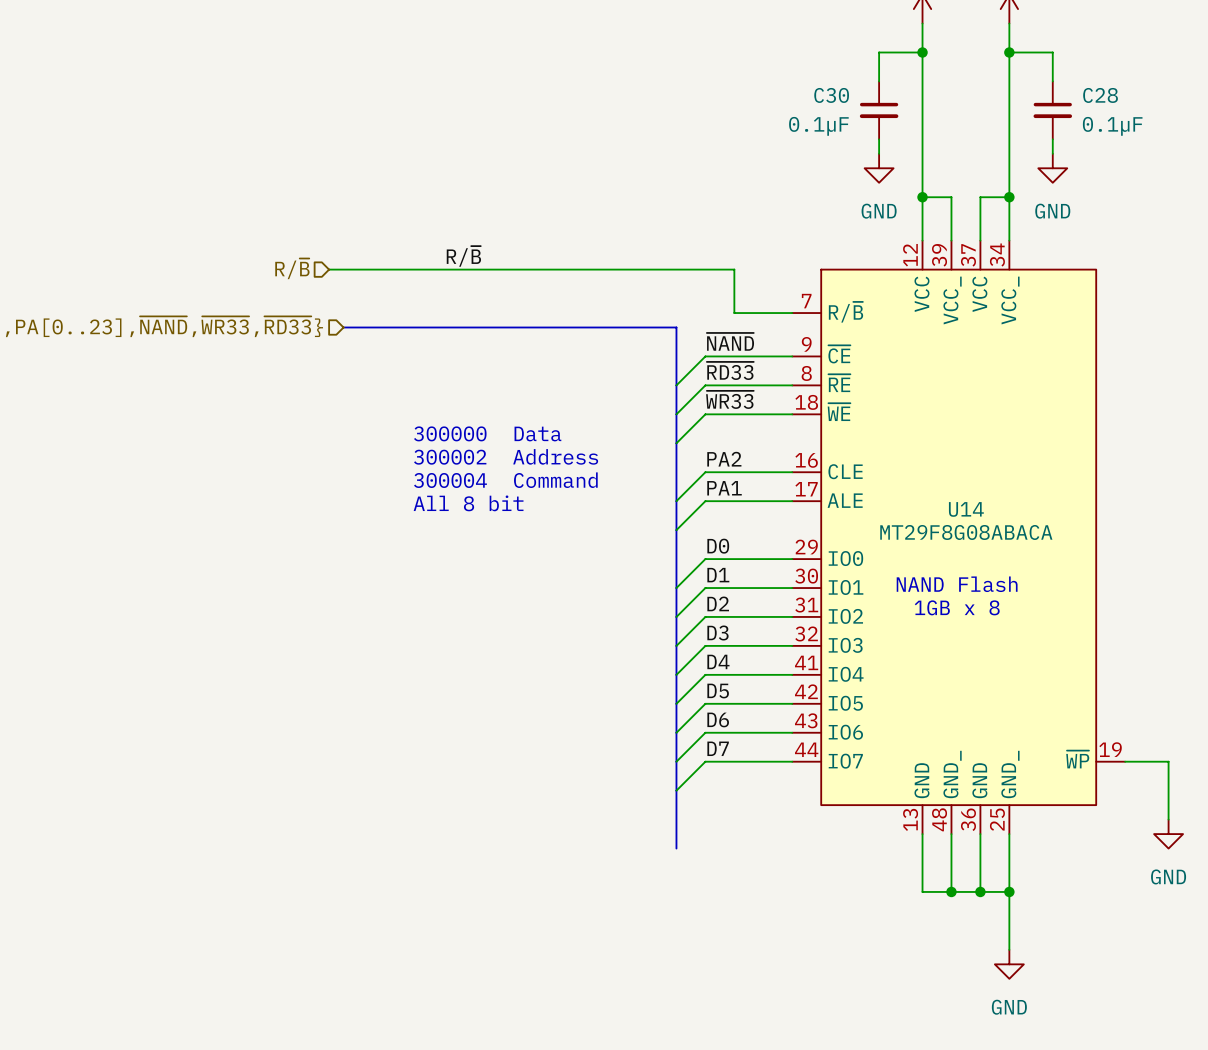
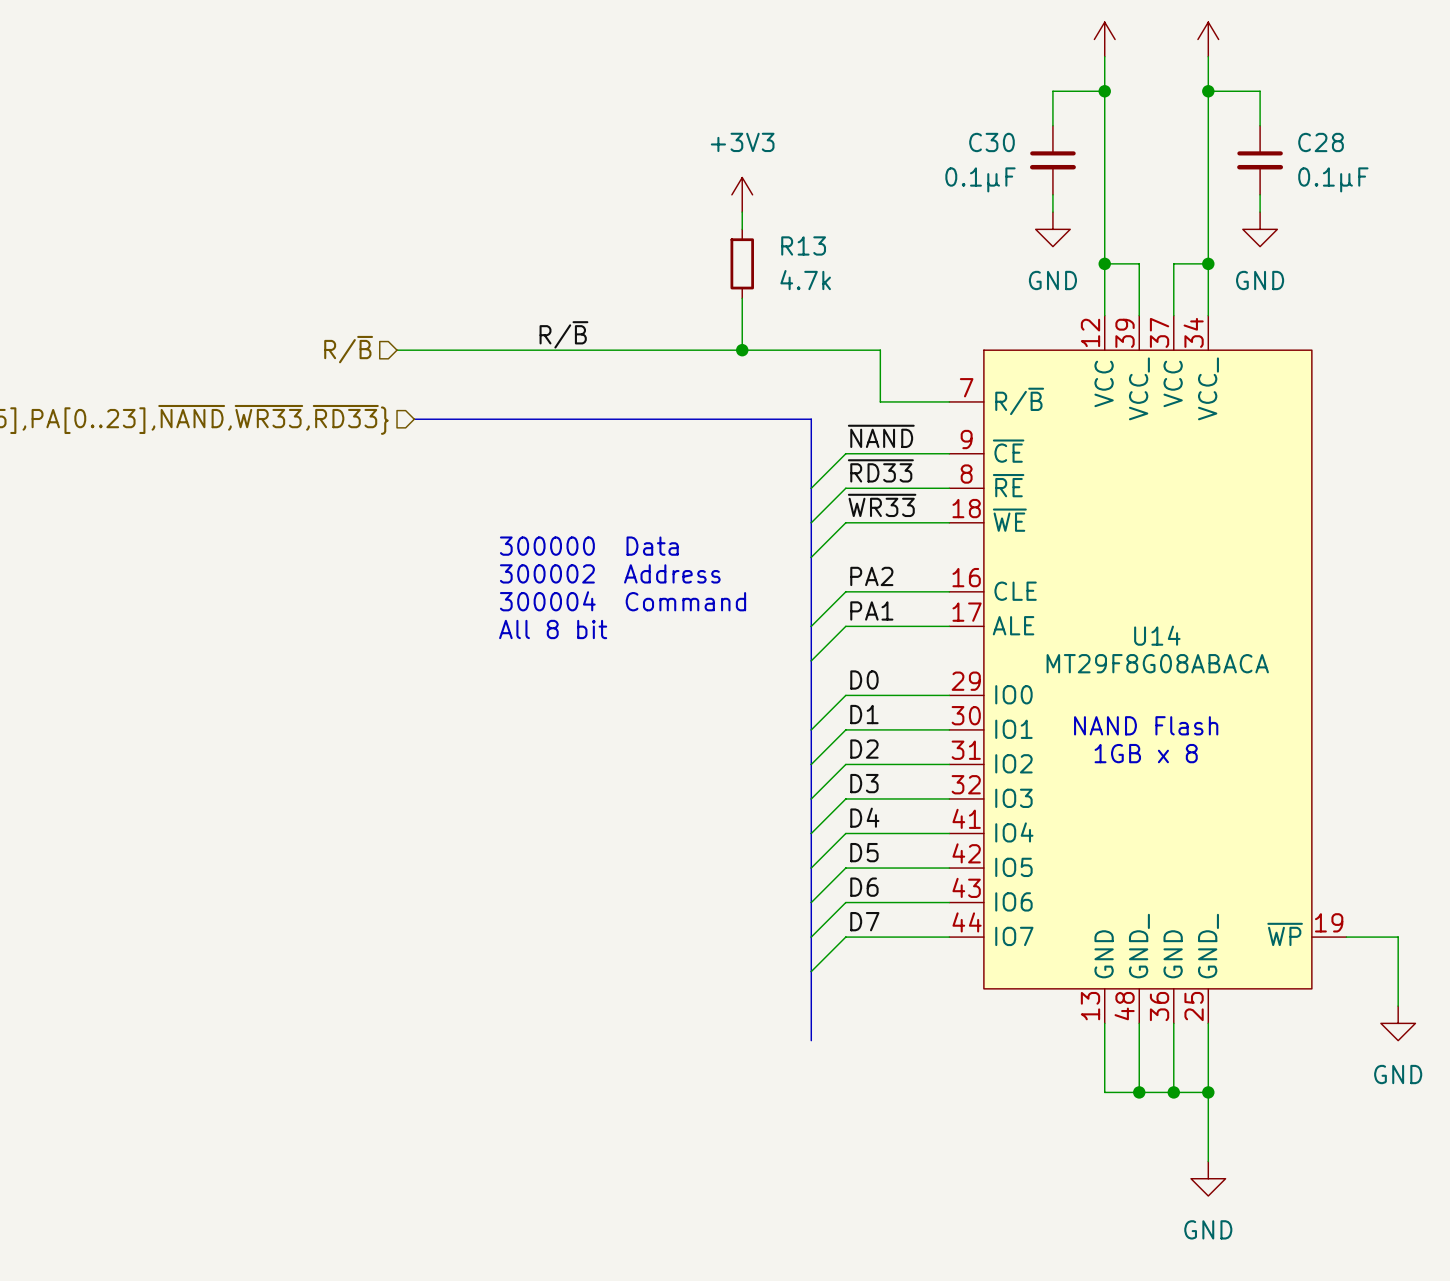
power symbol: none -> +3V3 (742, 194)
wire: none -> (742, 212) (742, 229)
R13: none -> 4.7k (742, 263)
wire: none -> (742, 298) (742, 350)
junction: none -> (742, 350)

